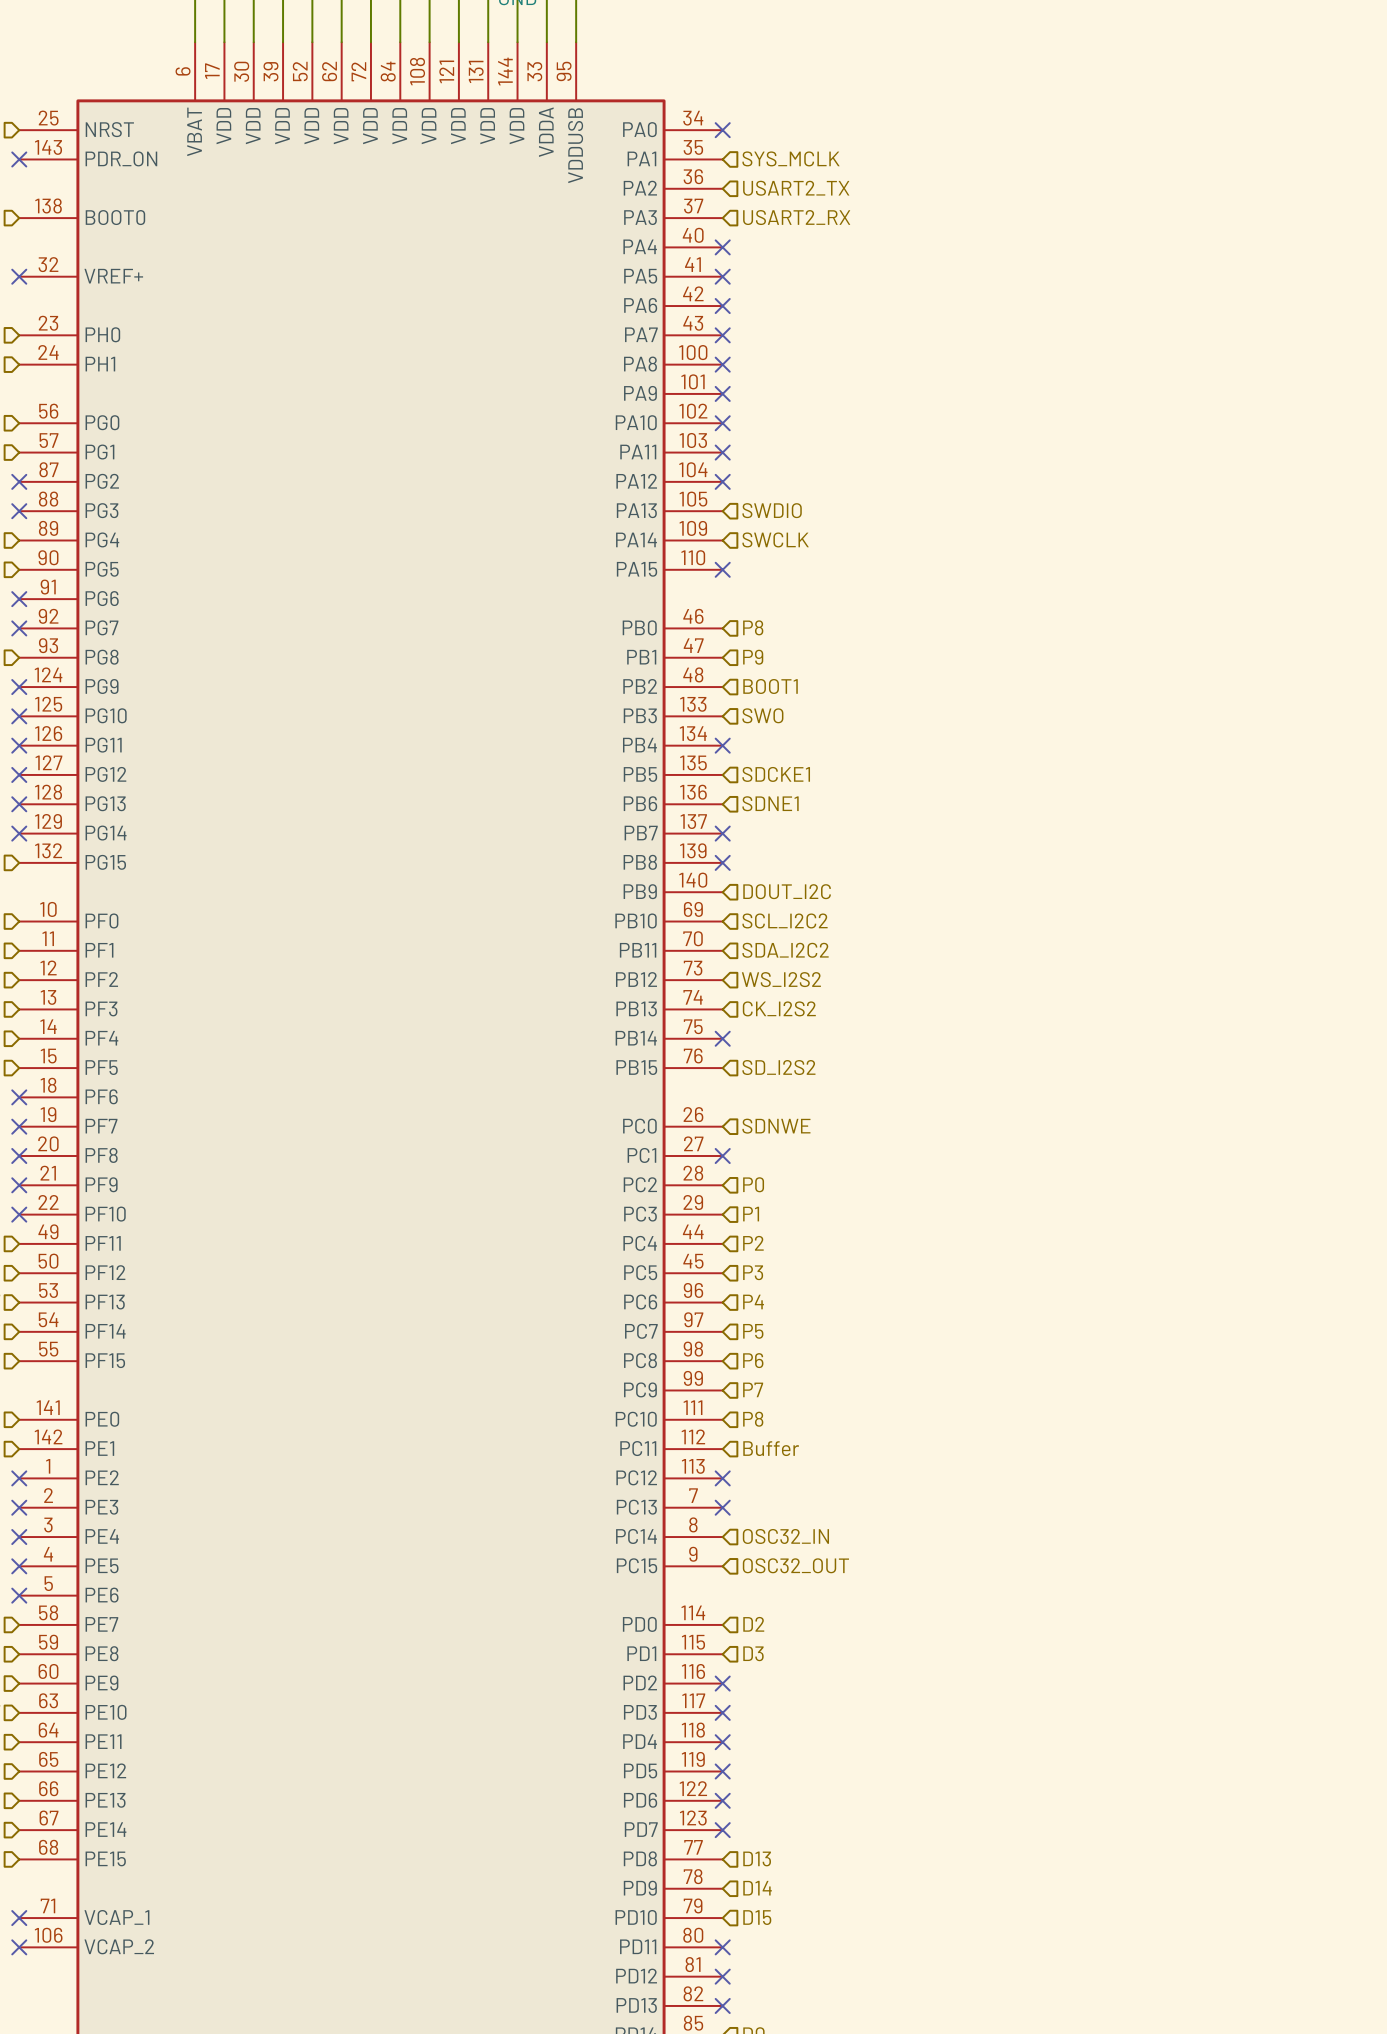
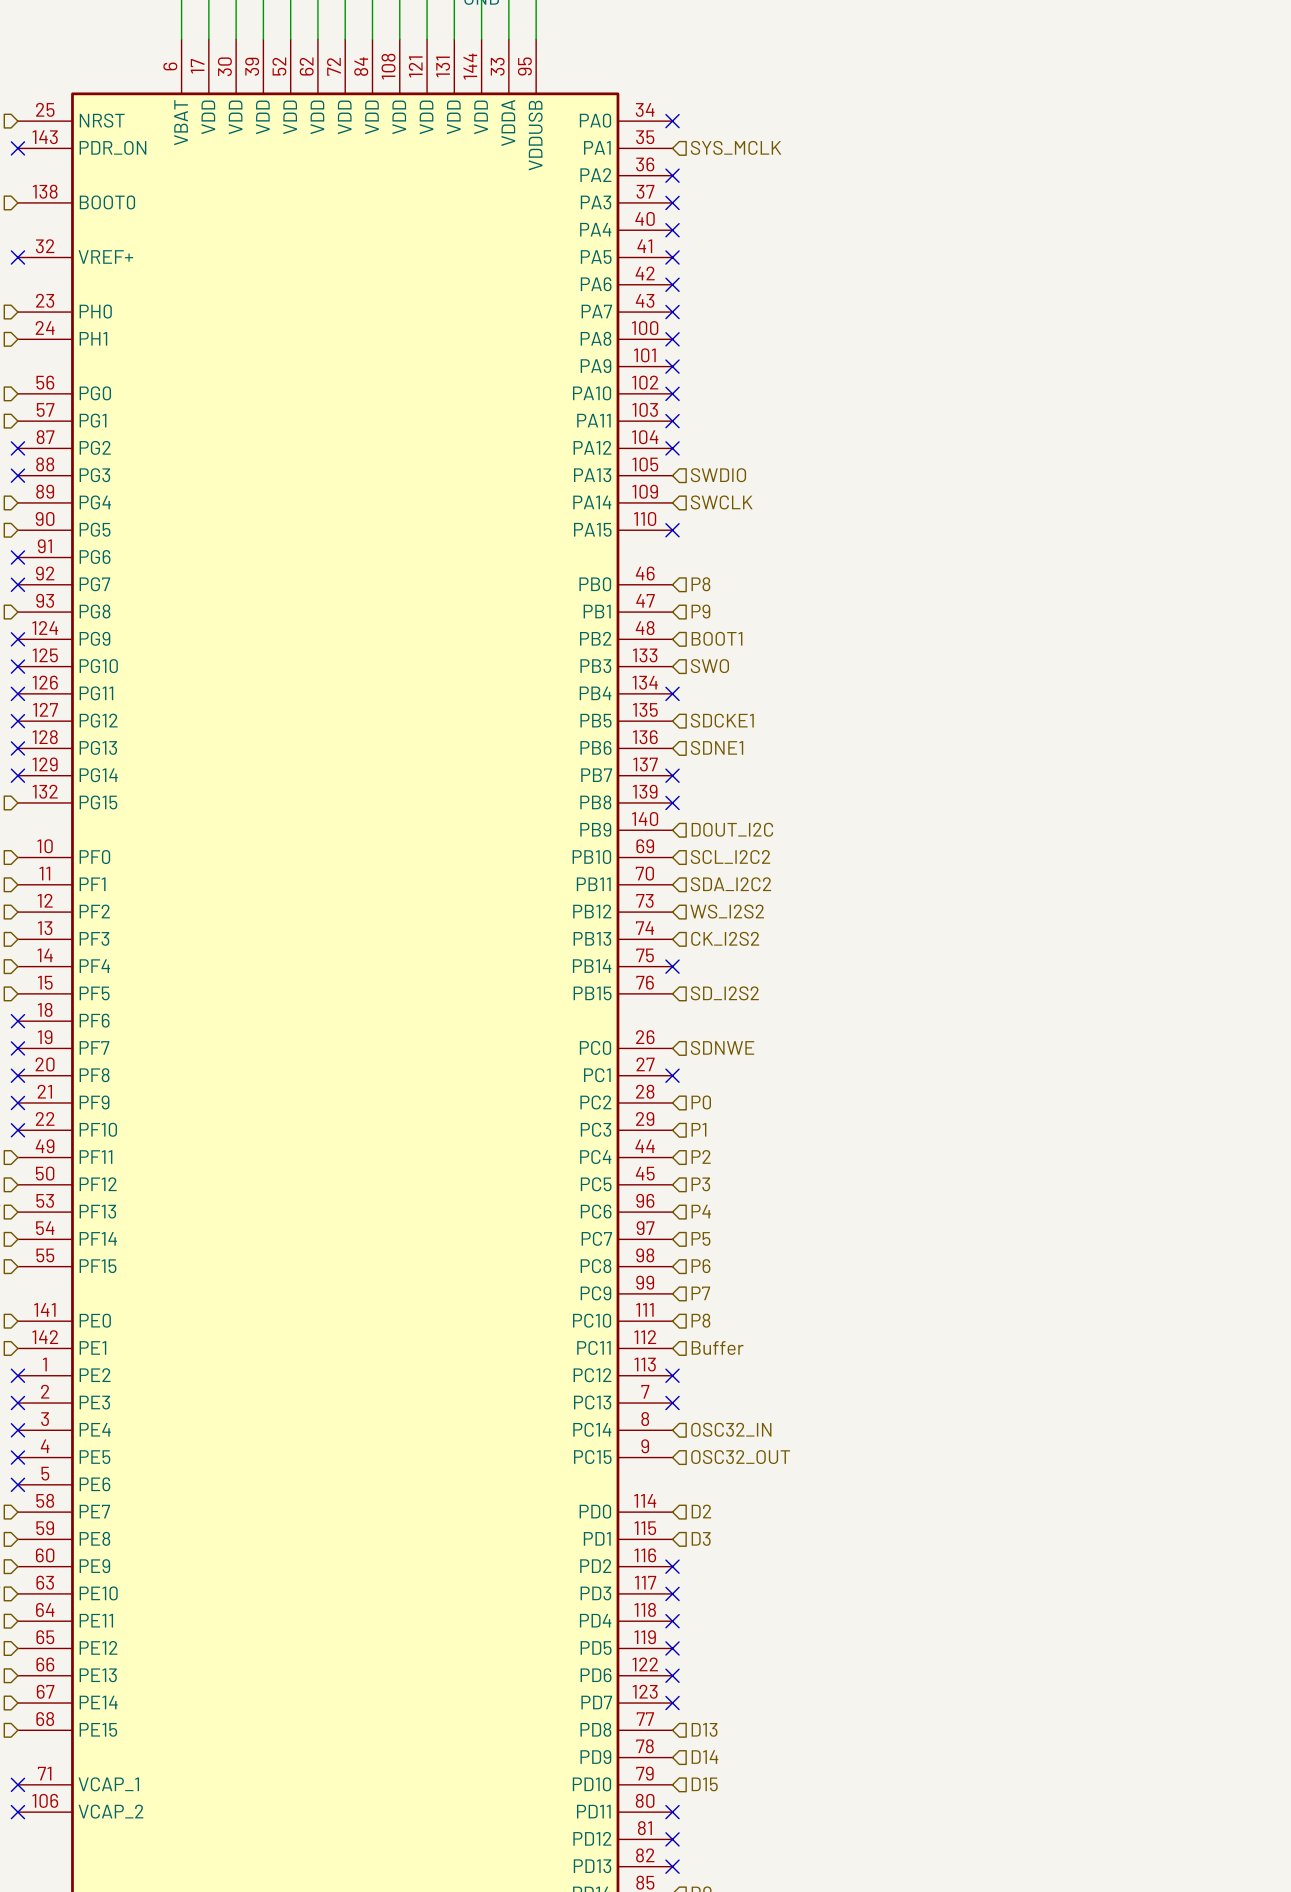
no-connect mark: none -> (672, 175)
hierarchical label: USART2_TX (796, 188) -> none
hierarchical label: USART2_RX (796, 217) -> none
no-connect mark: none -> (672, 202)

